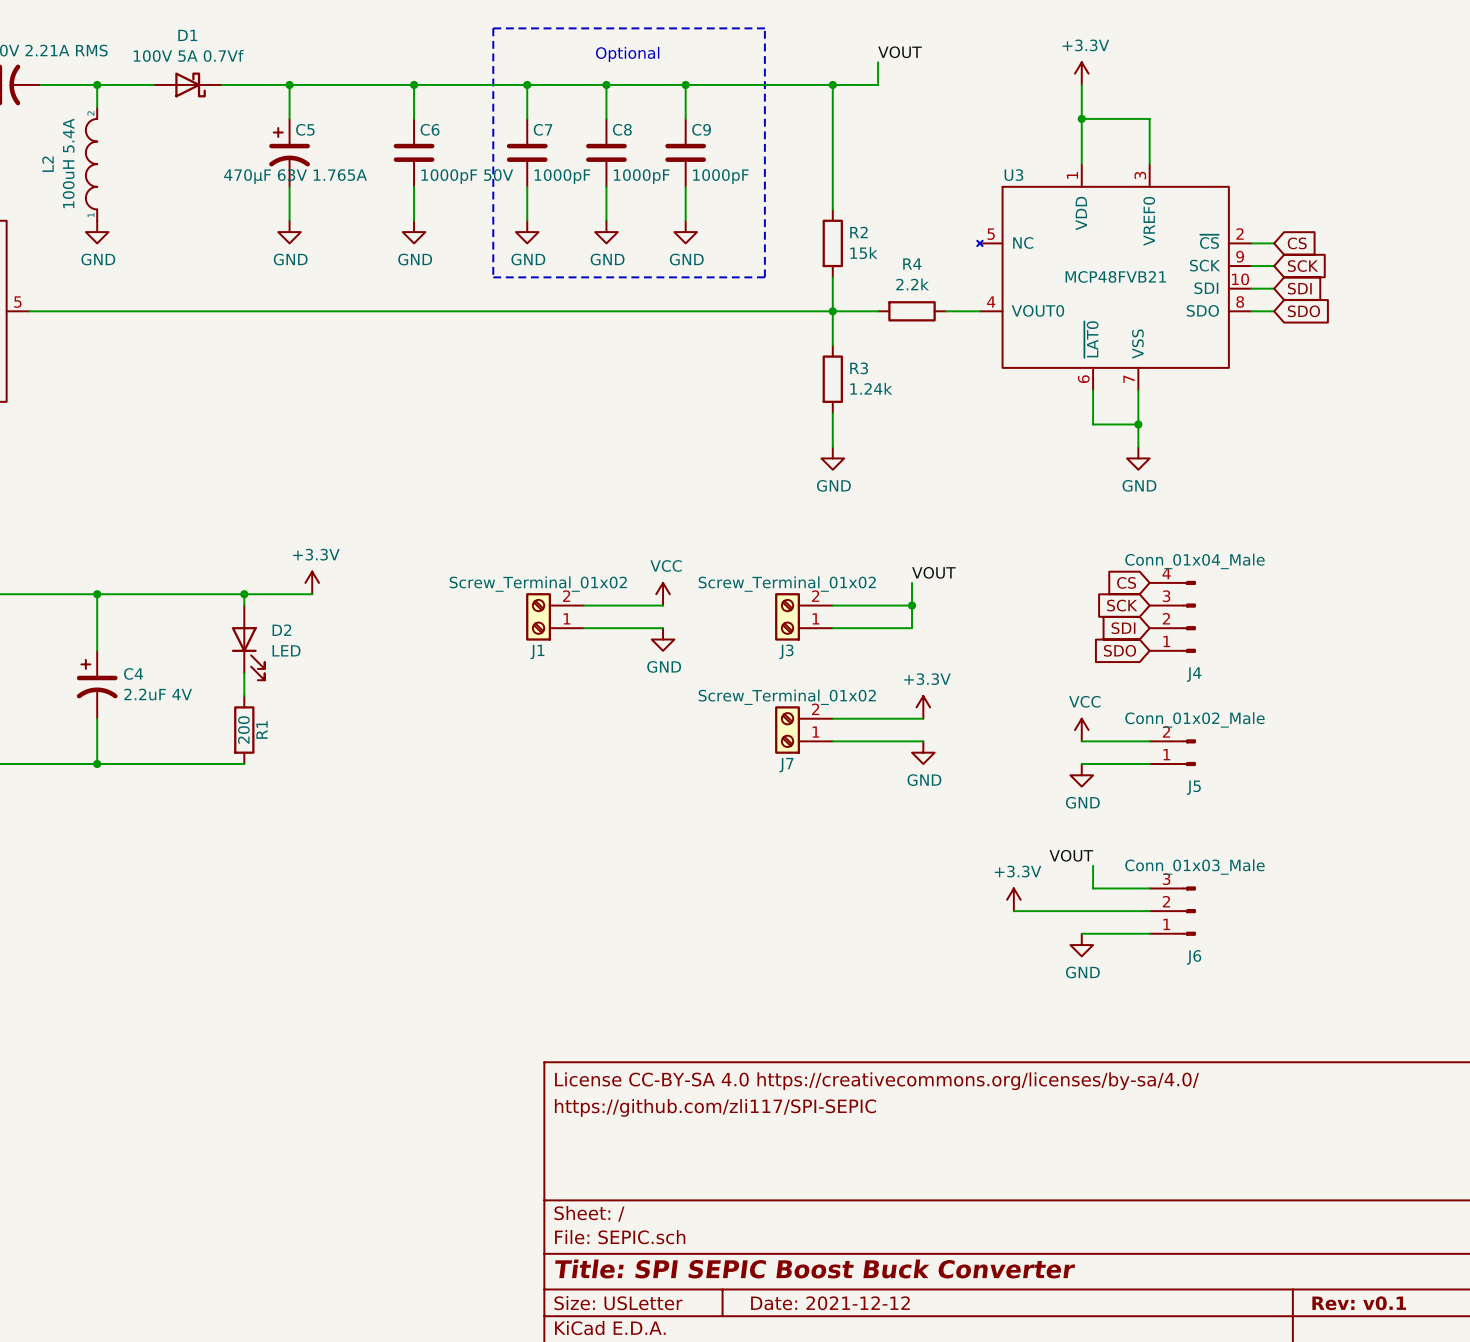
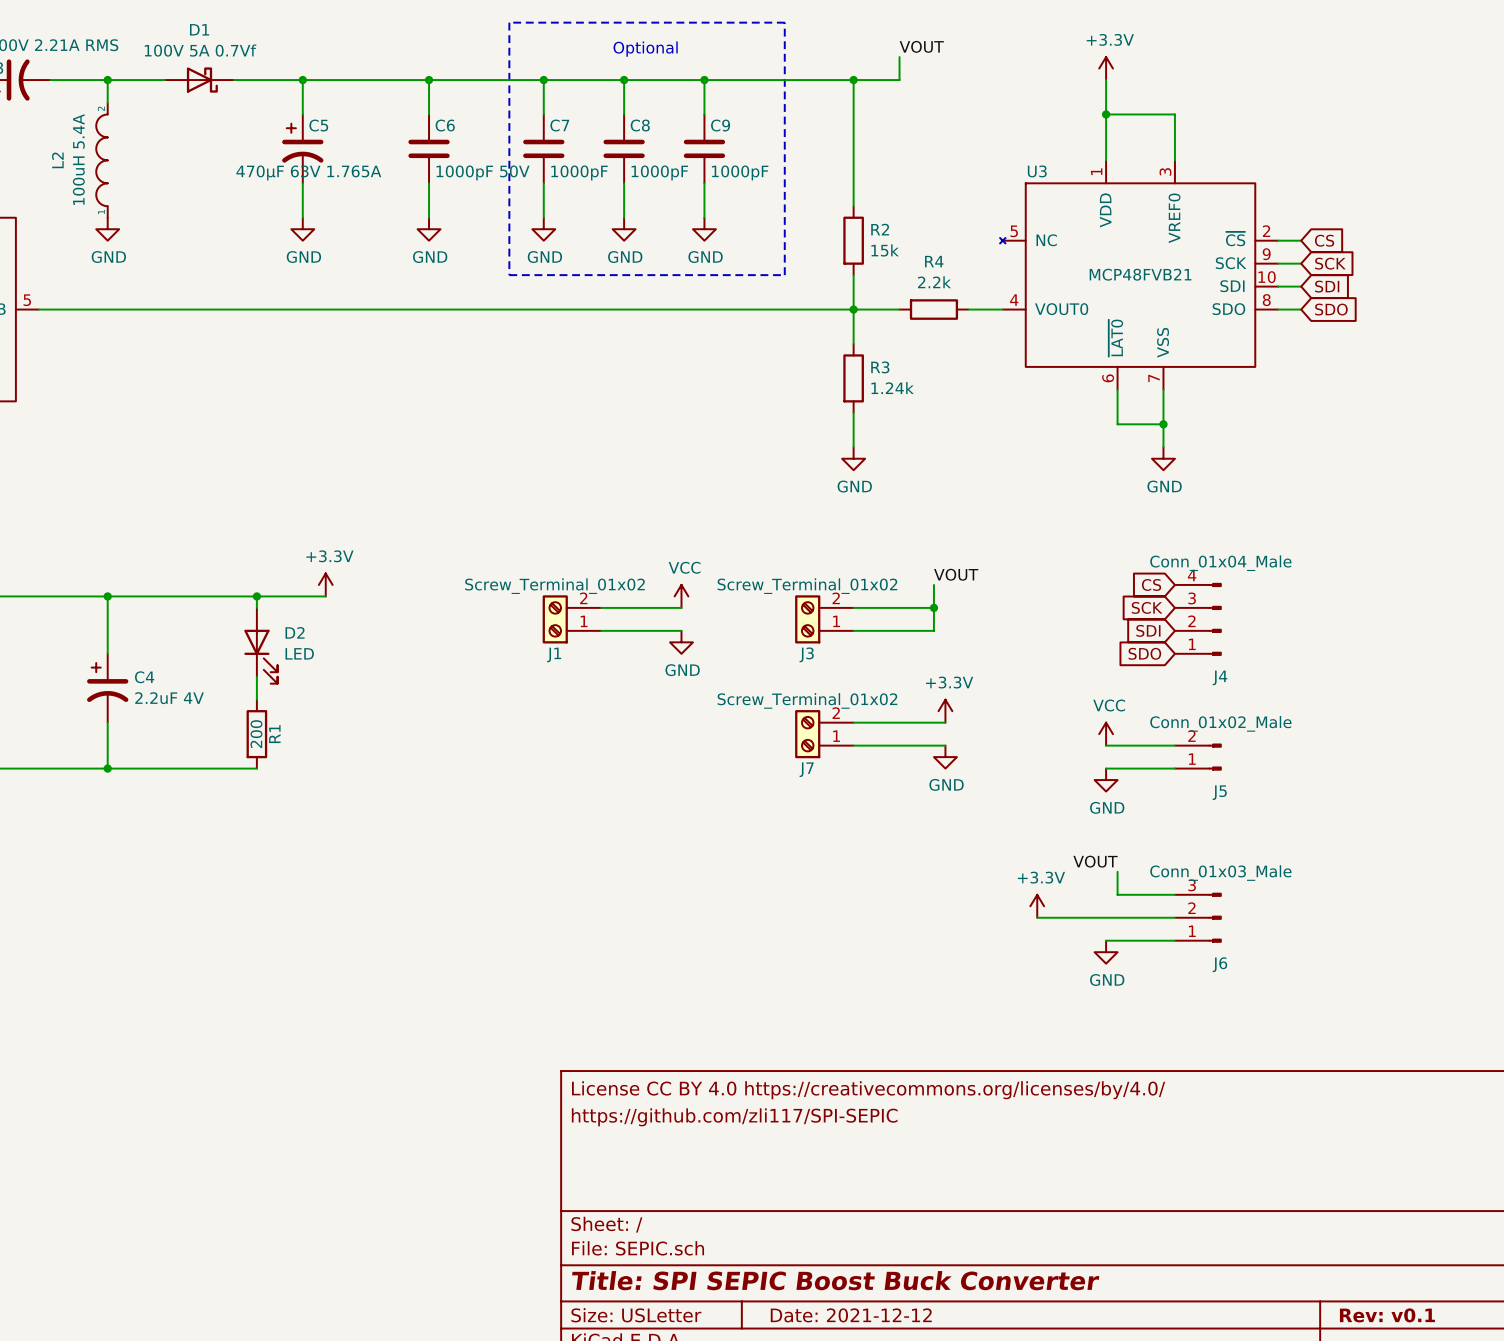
title block: License CC-BY-SA 4.0 https://creativecommons.org/licenses/by-sa/4.0/ (877, 1081) -> License CC BY 4.0 https://creativecommons.org/licenses/by/4.0/ (868, 1090)

